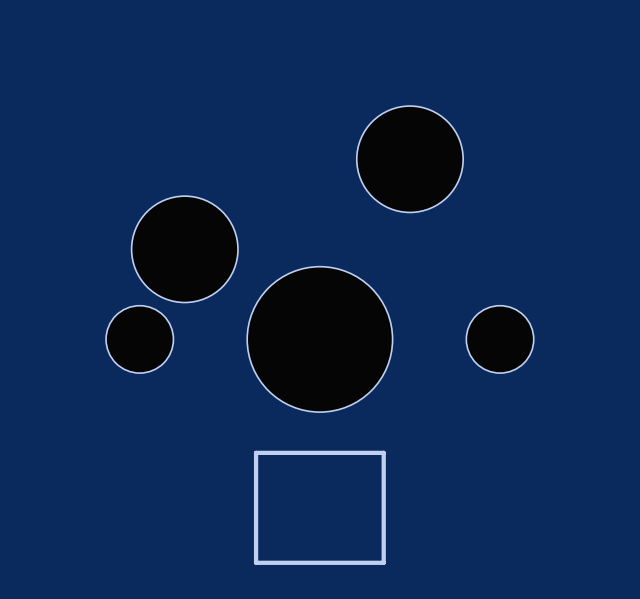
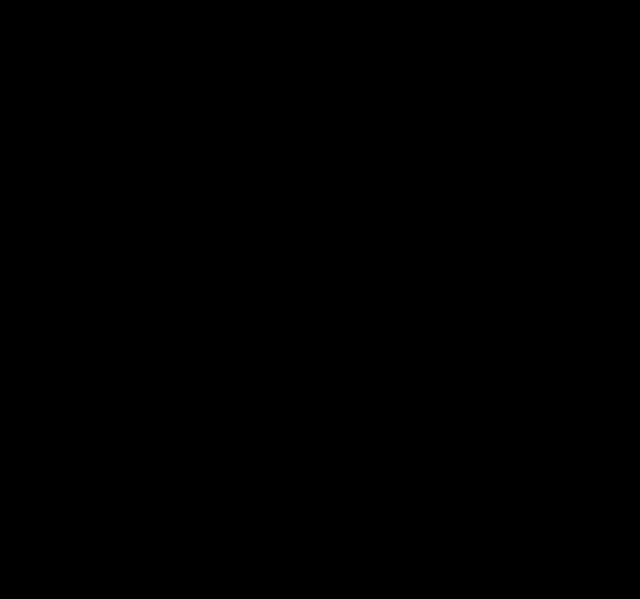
part: (319, 259) -> none
part: (319, 507) -> none

